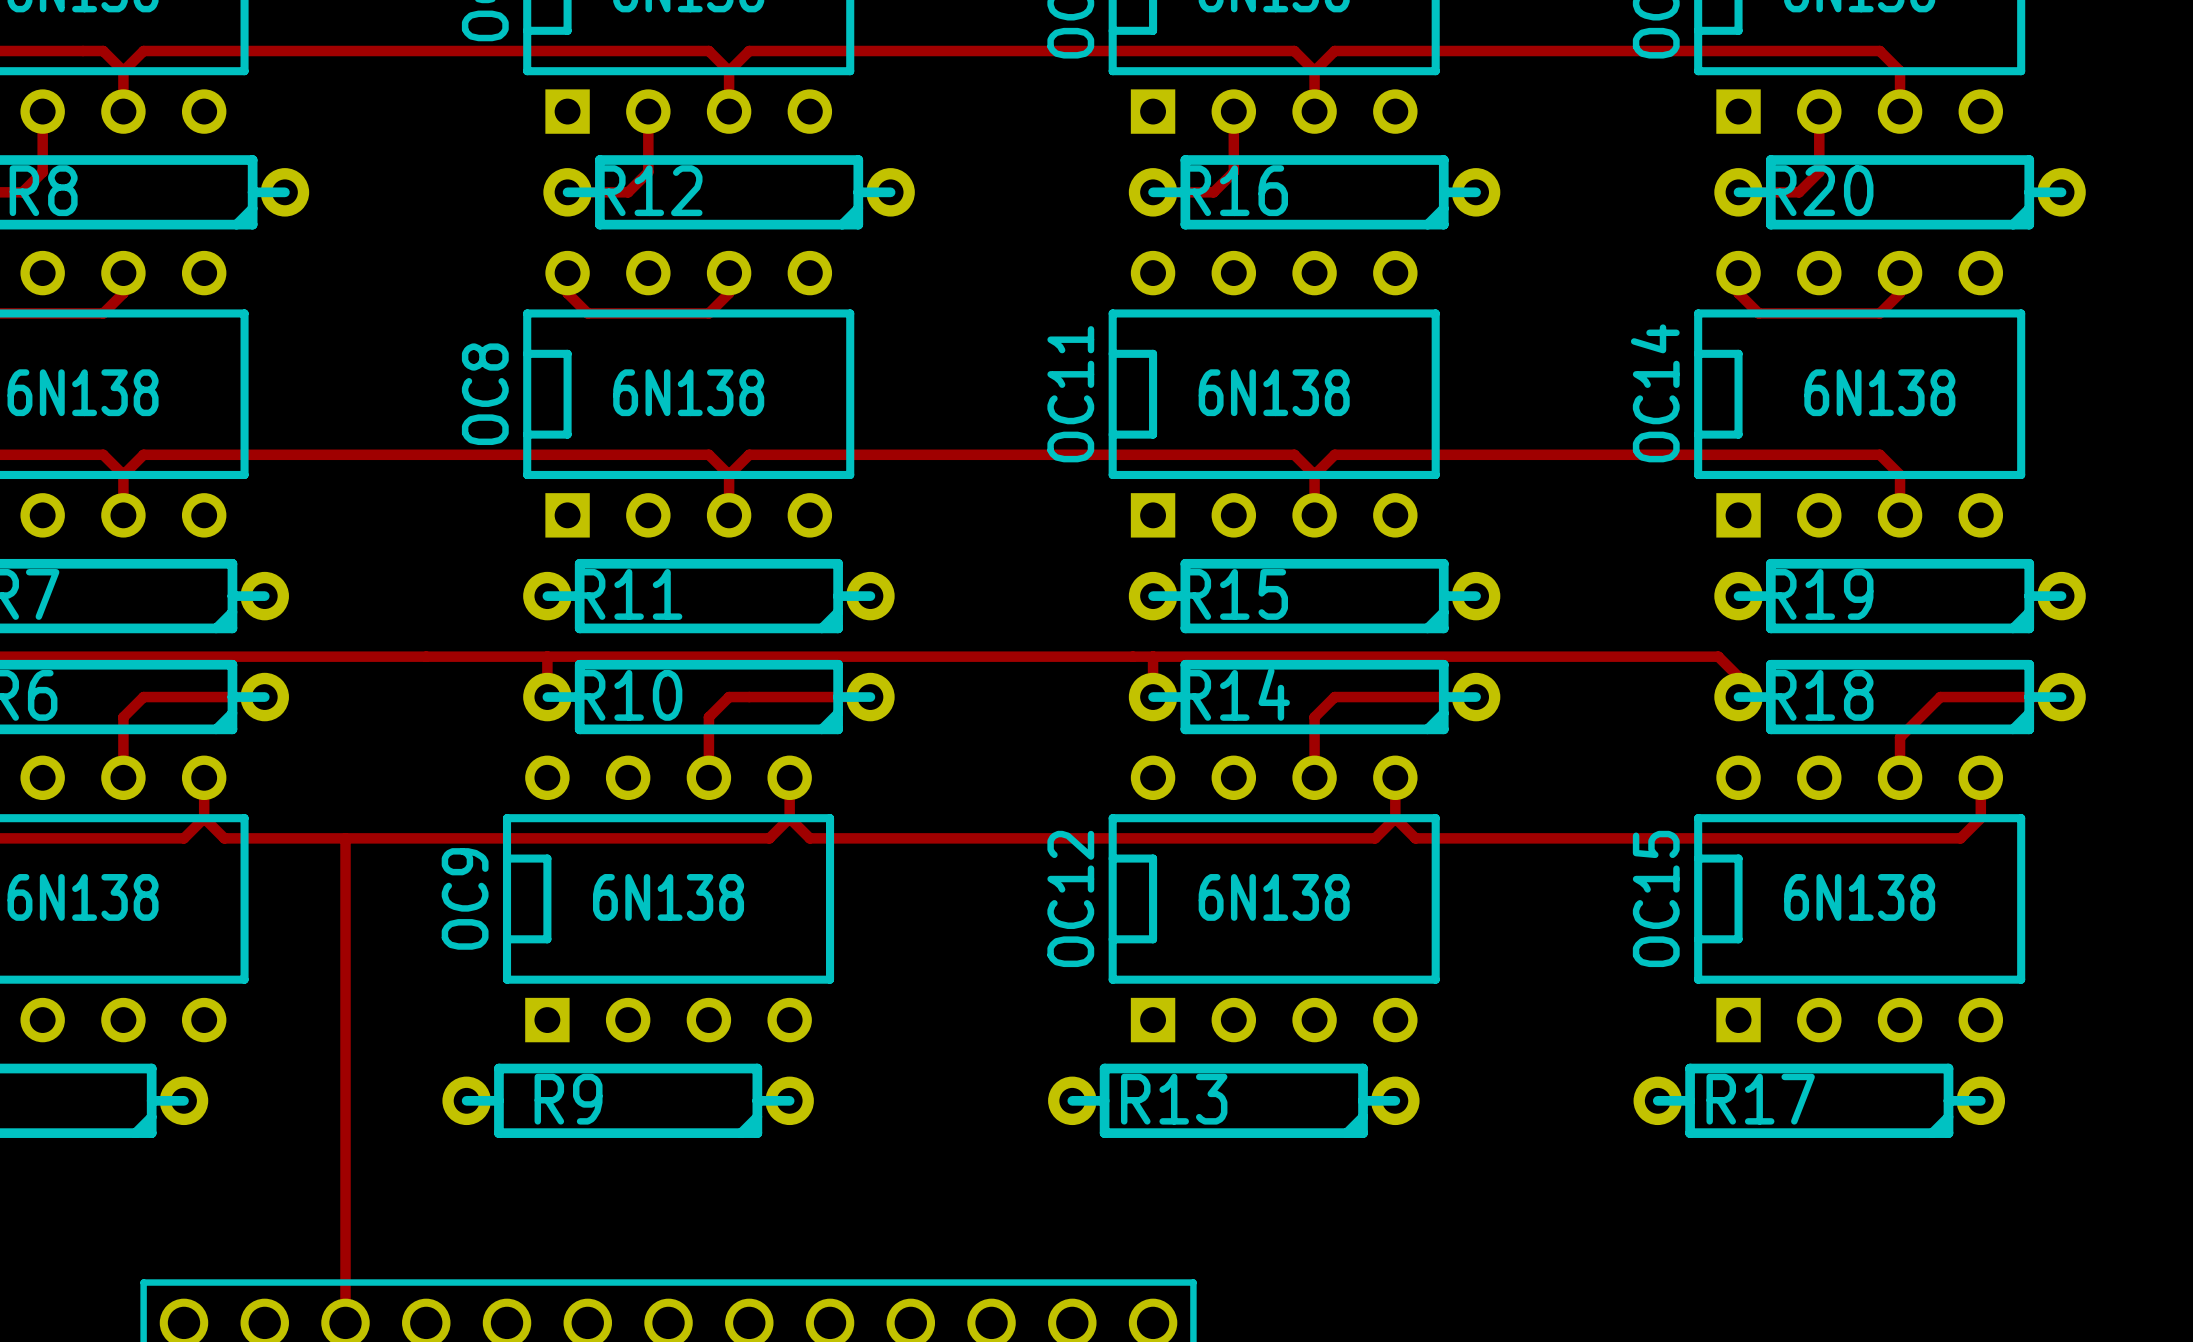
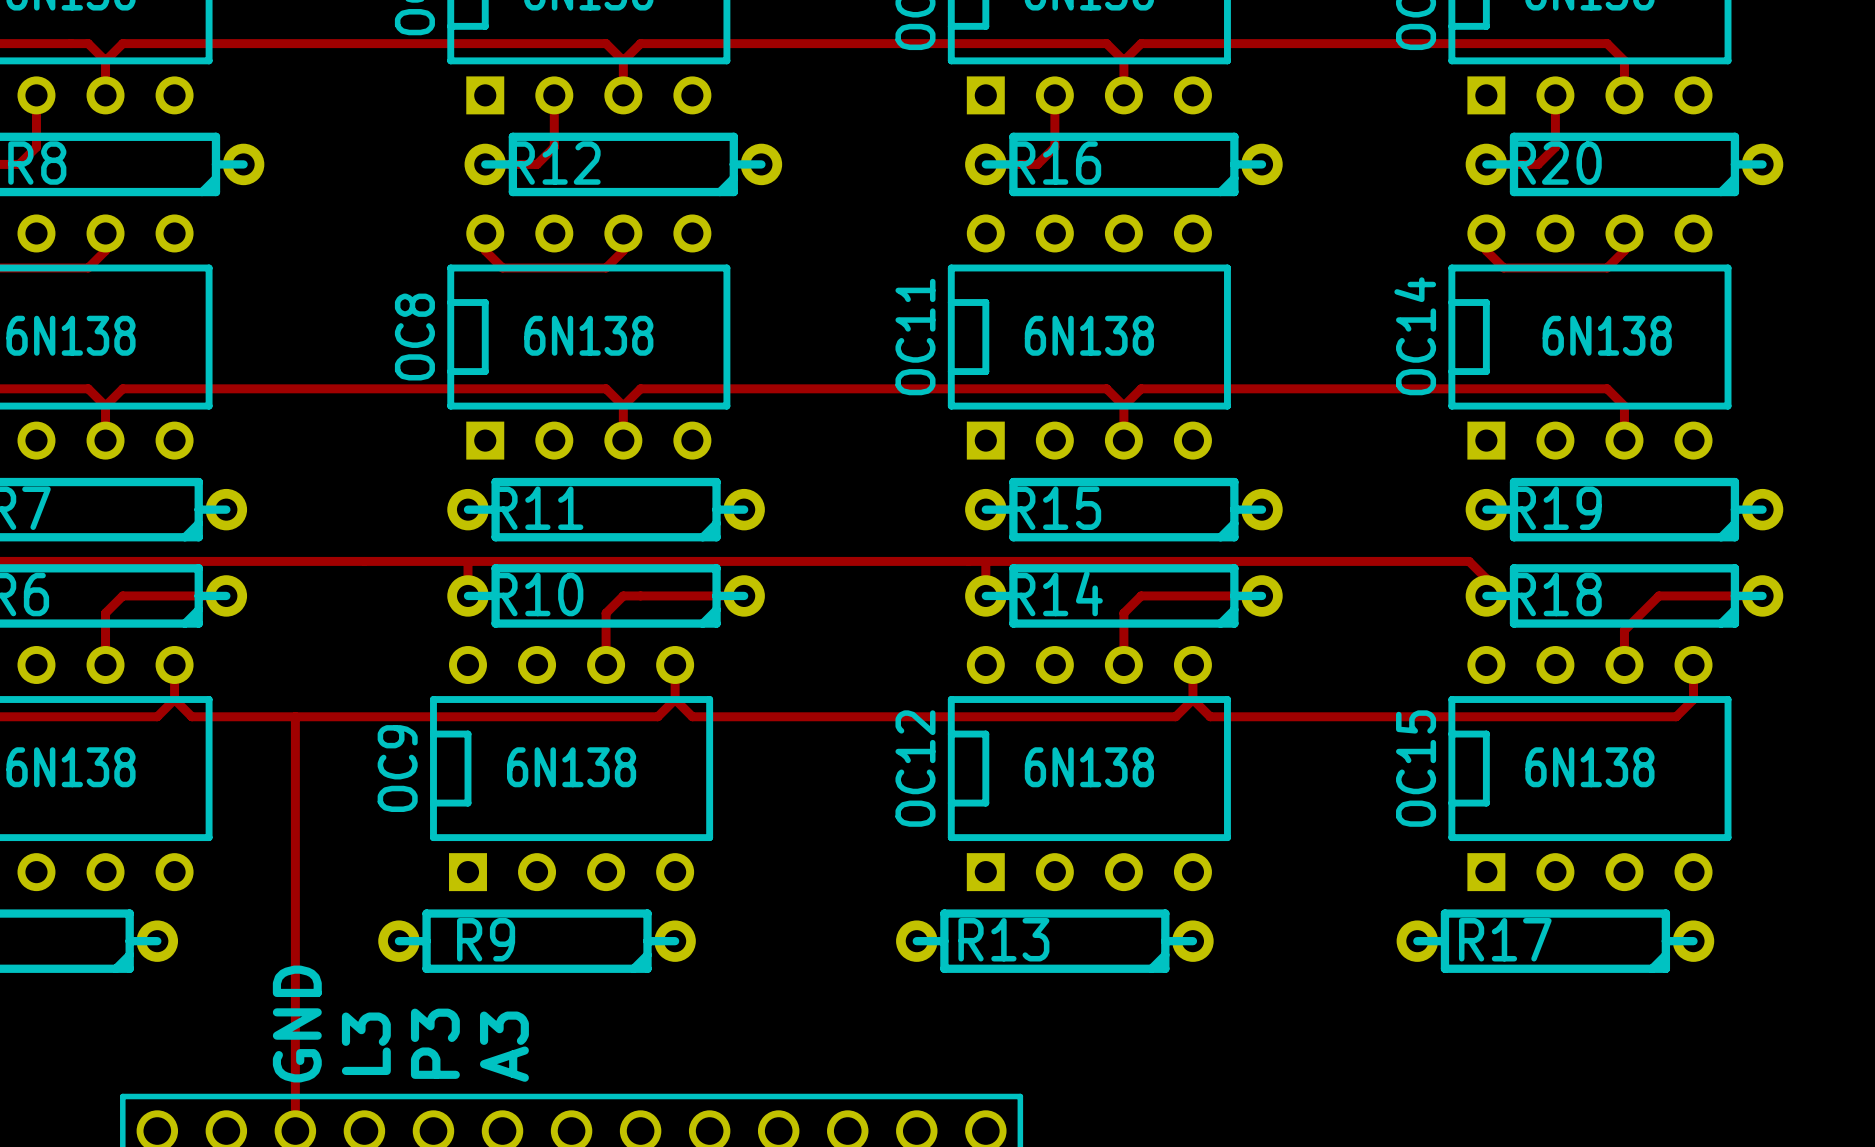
text: none -> GND (297, 1024)
text: none -> L3 (366, 1043)
text: none -> P3 (435, 1043)
text: none -> A3 (504, 1046)

